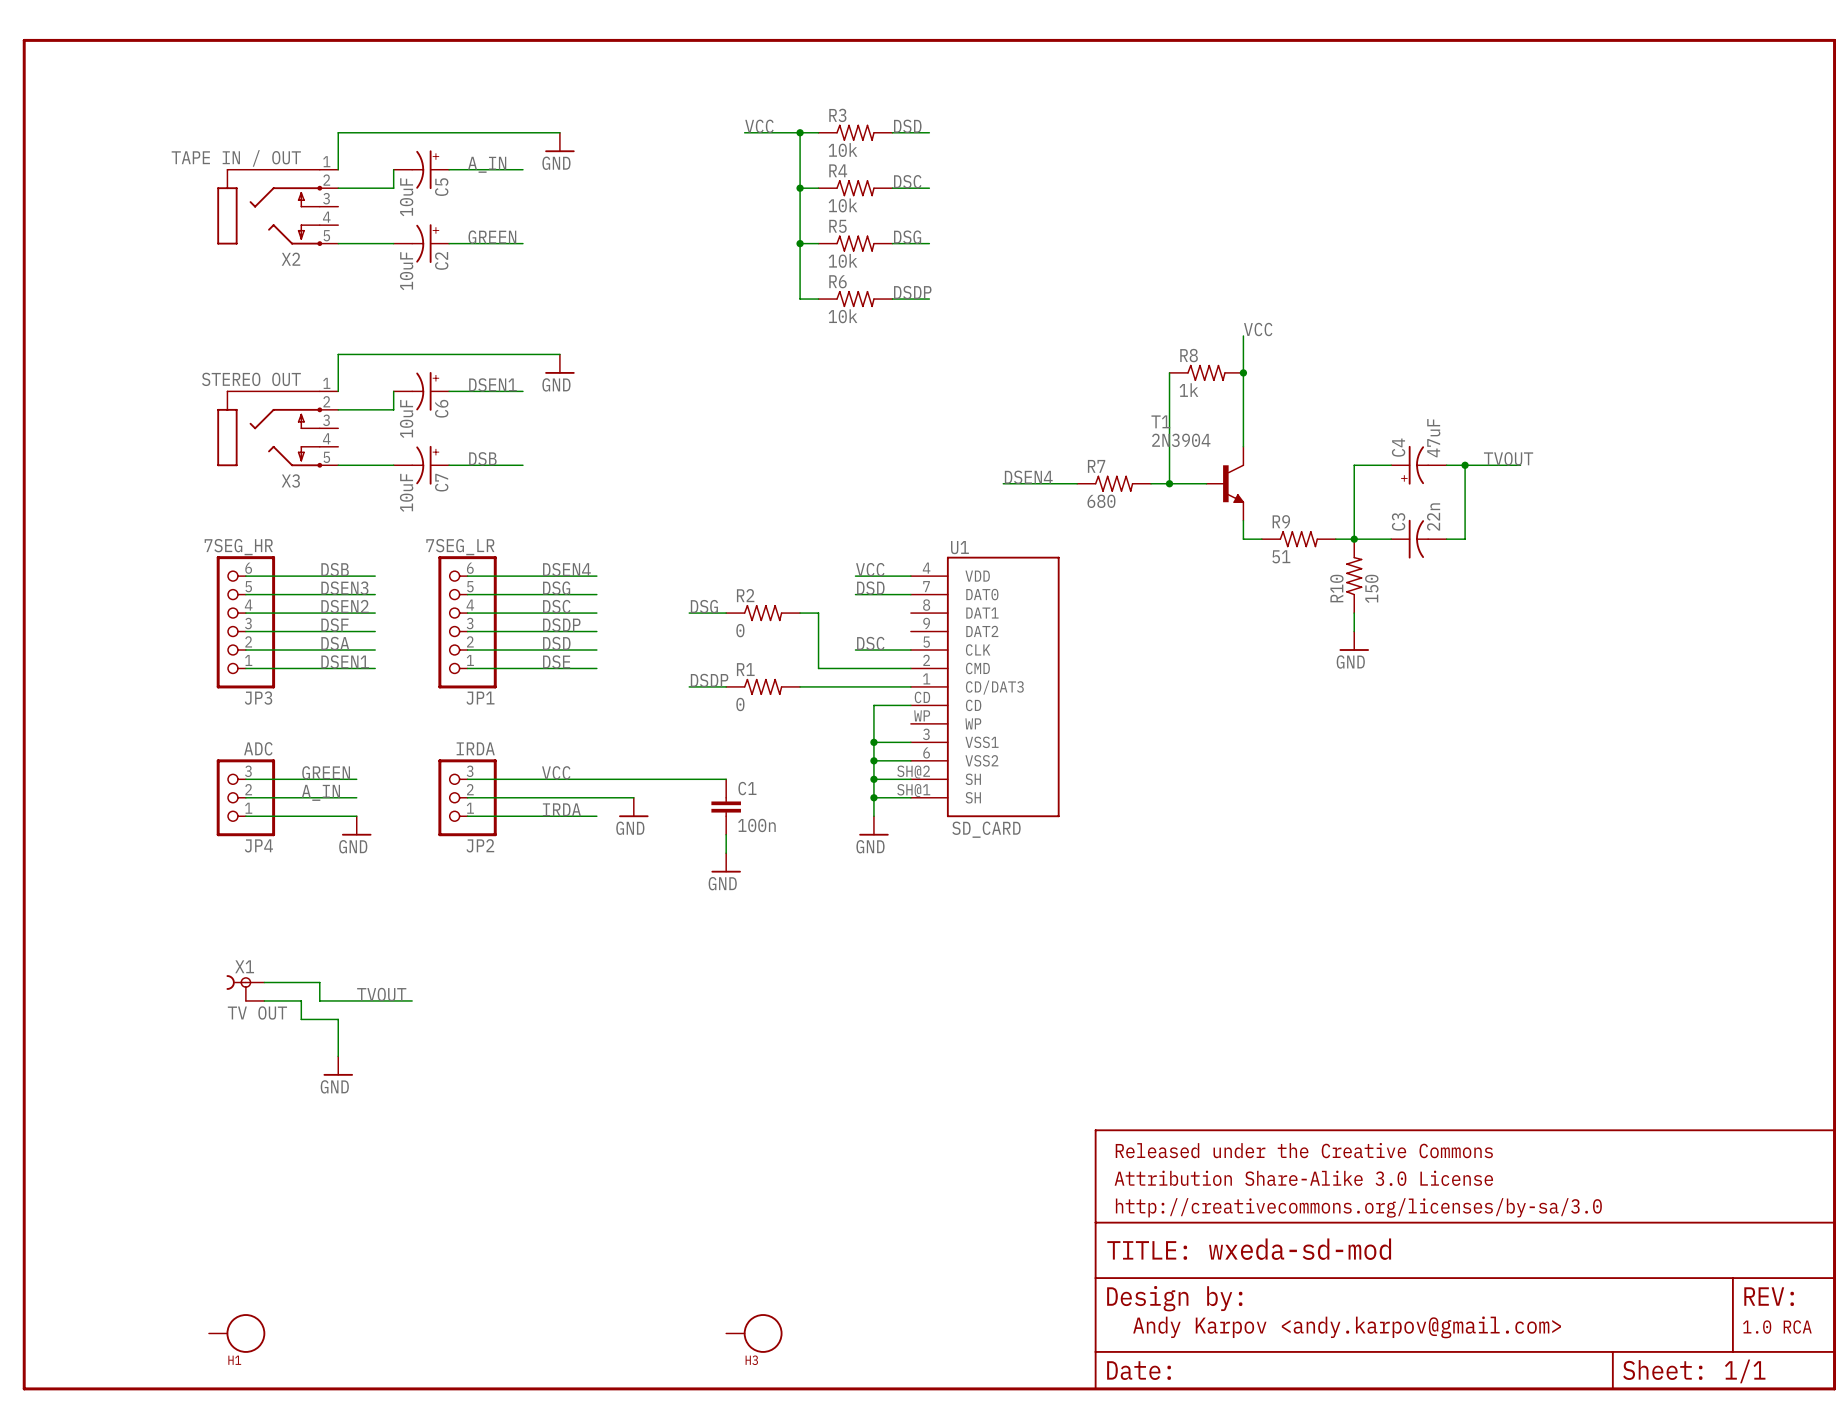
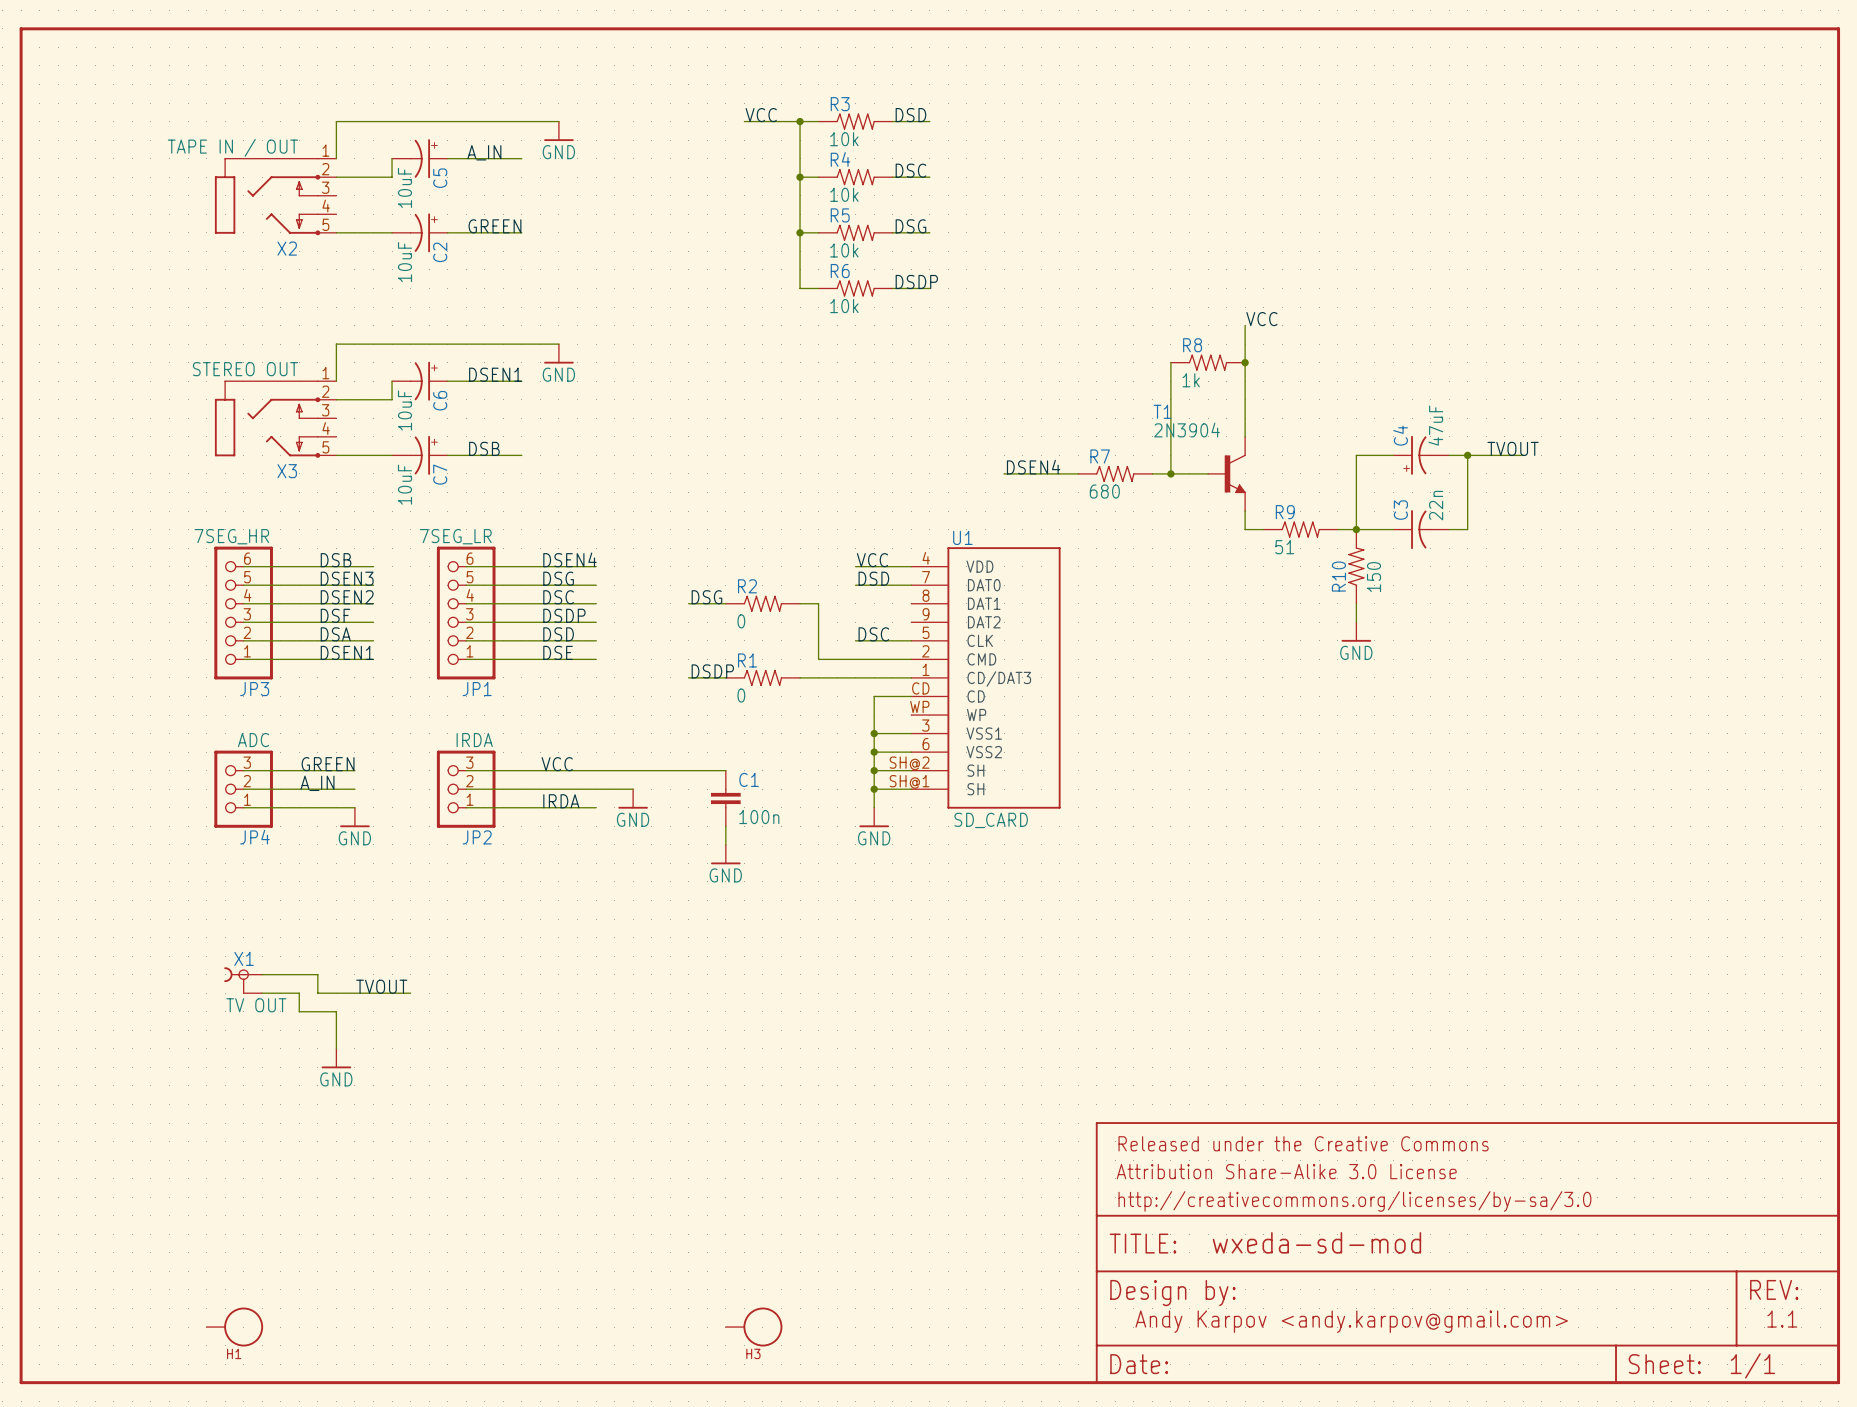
text: none -> 1.1 (1782, 1319)
text: 1.0 RCA (1777, 1327) -> none

